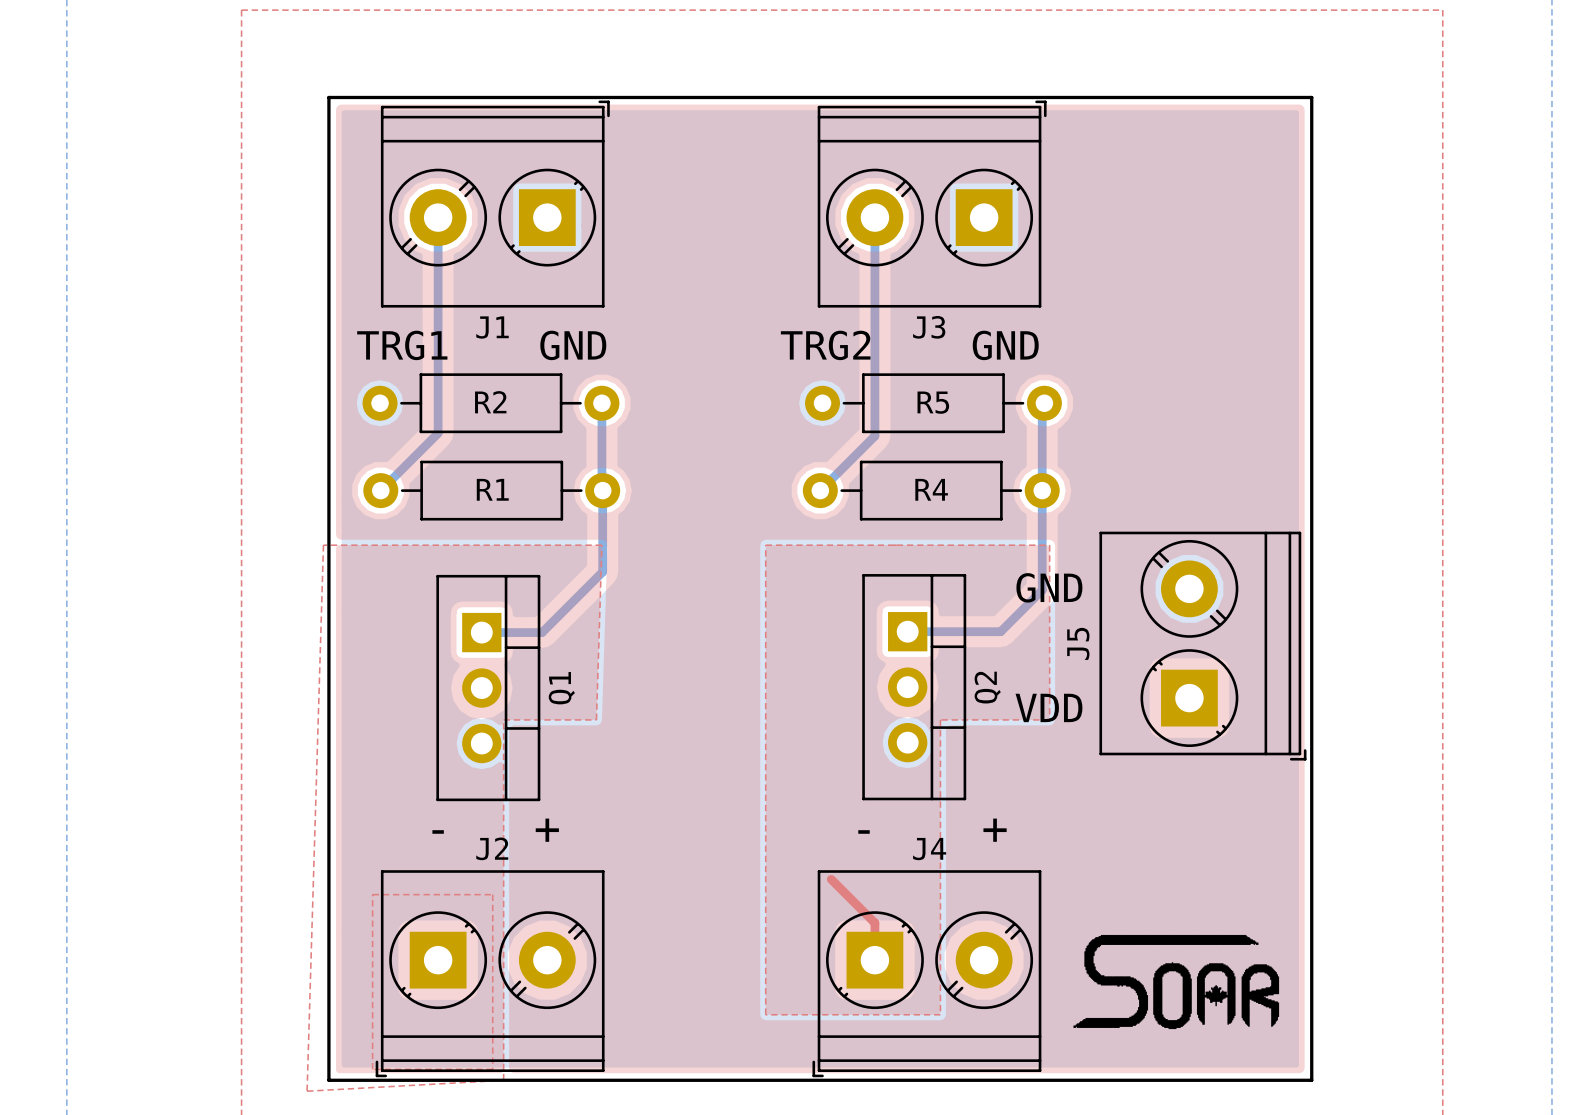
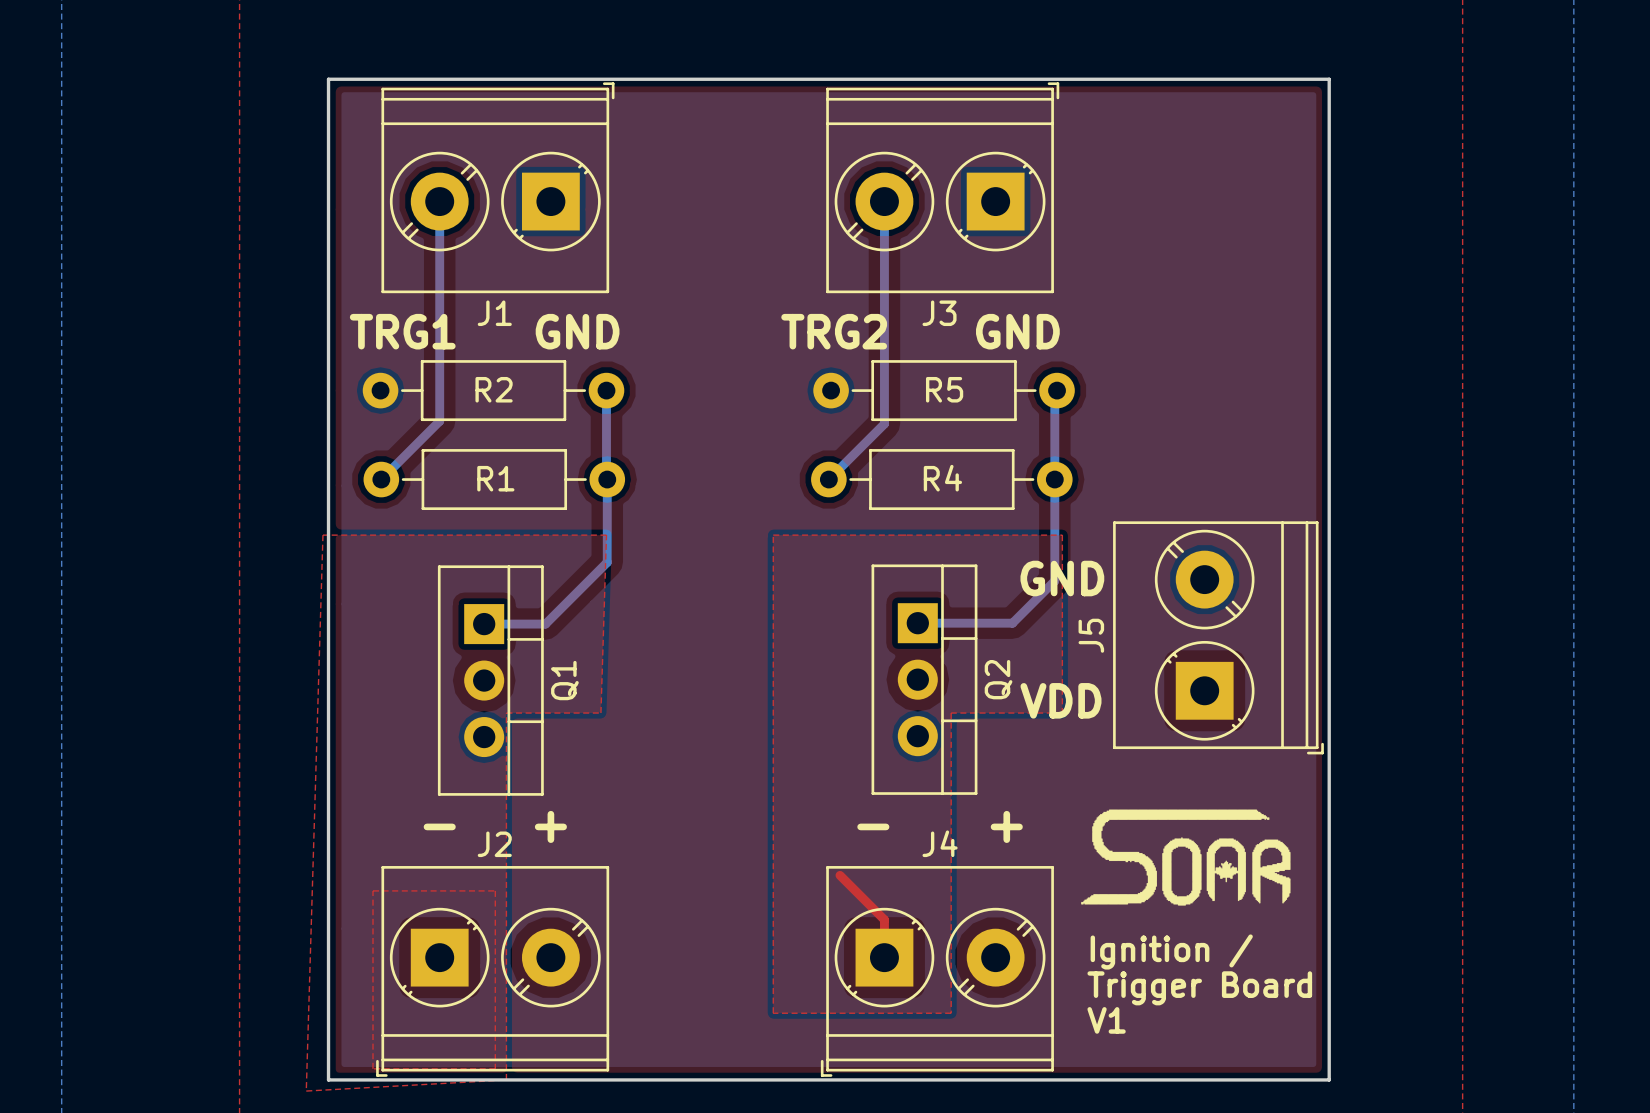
text: none -> Ignition / (1171, 951)
drawing position: (1176, 982) -> (1185, 857)
text: none -> Trigger Board (1199, 988)
text: none -> V1 (1106, 1020)

